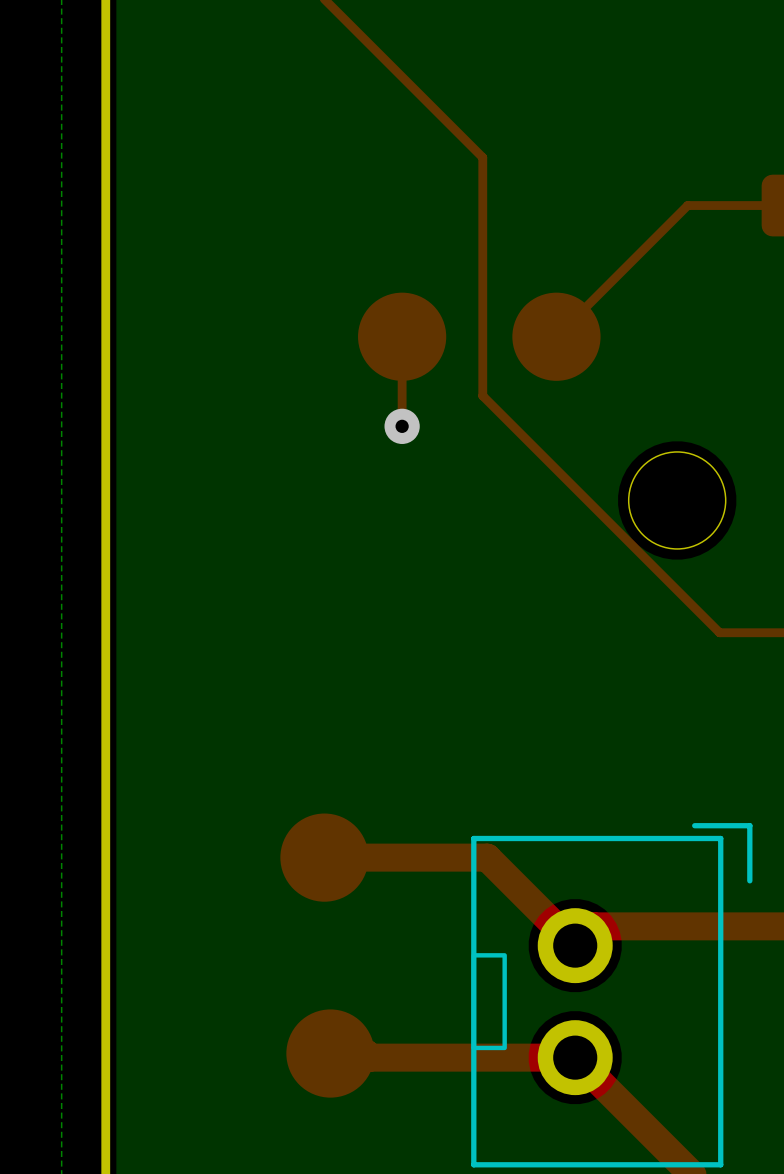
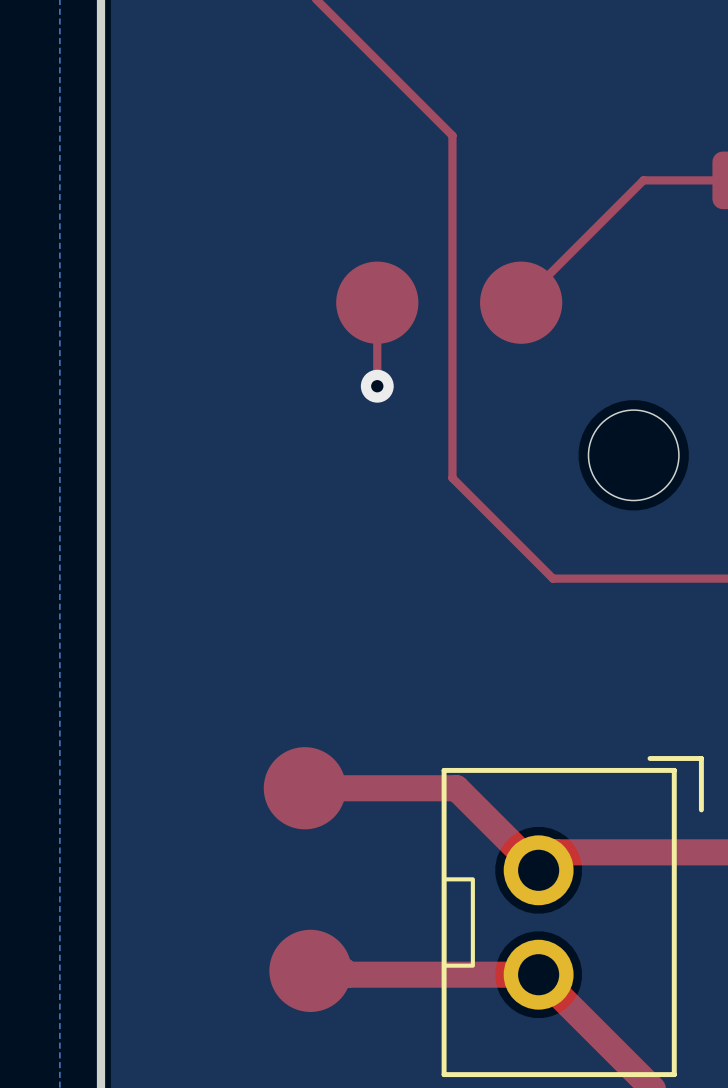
top track: (482, 395) (719, 632) -> (452, 357) (452, 478) (552, 578) (673, 578)

